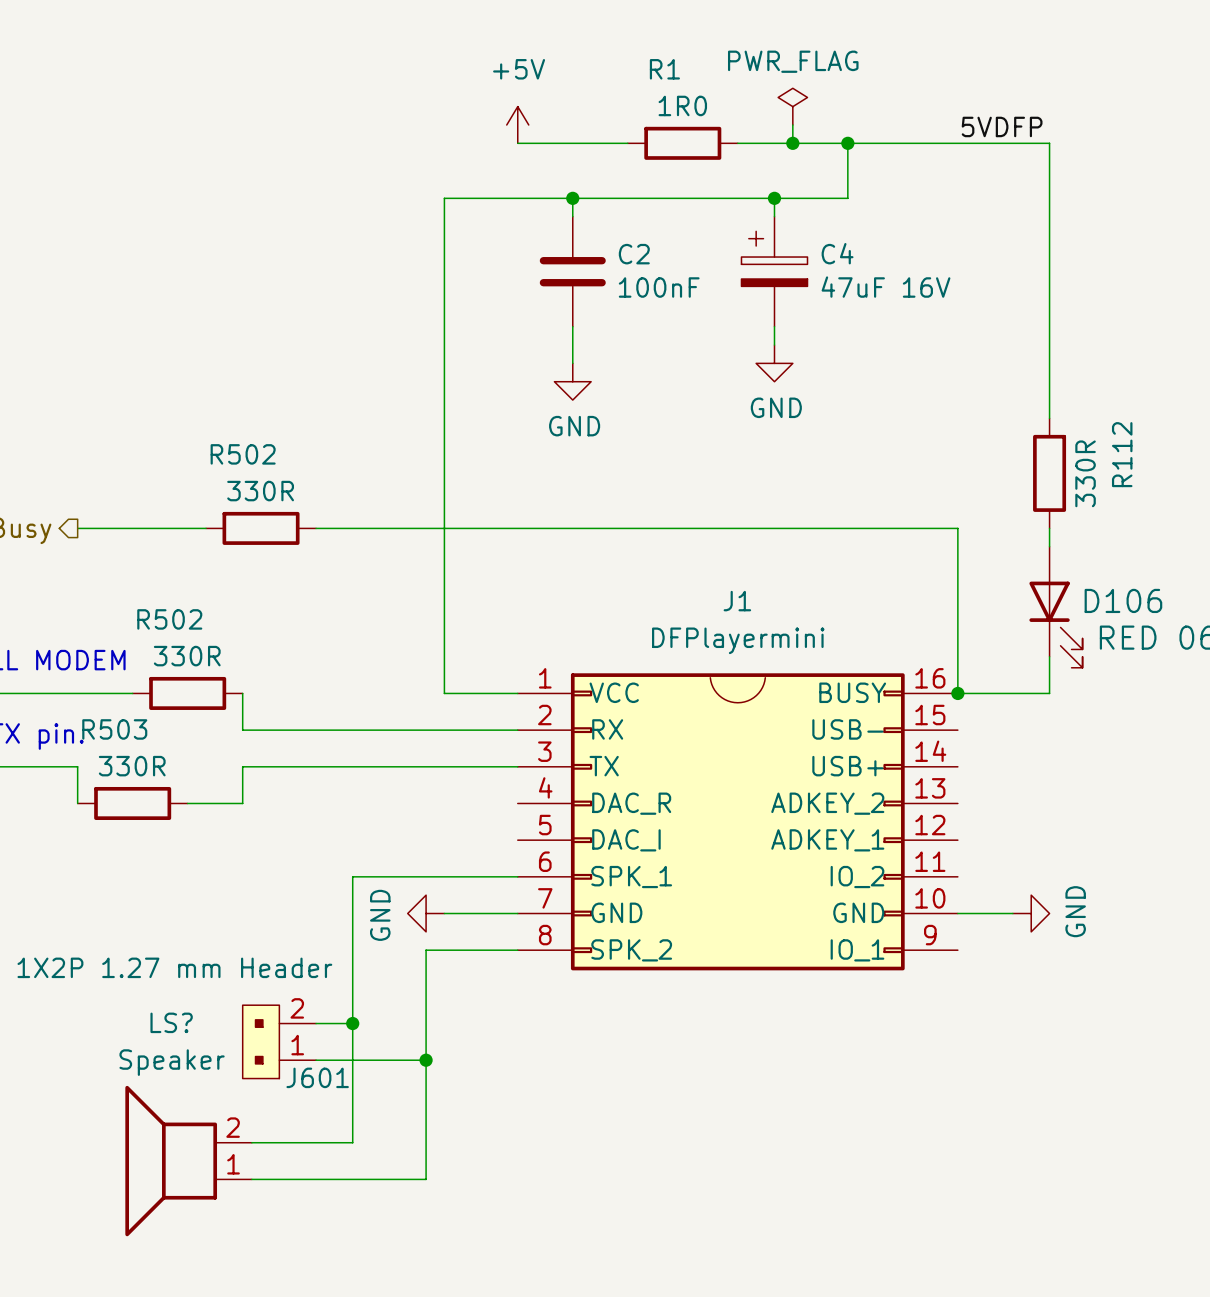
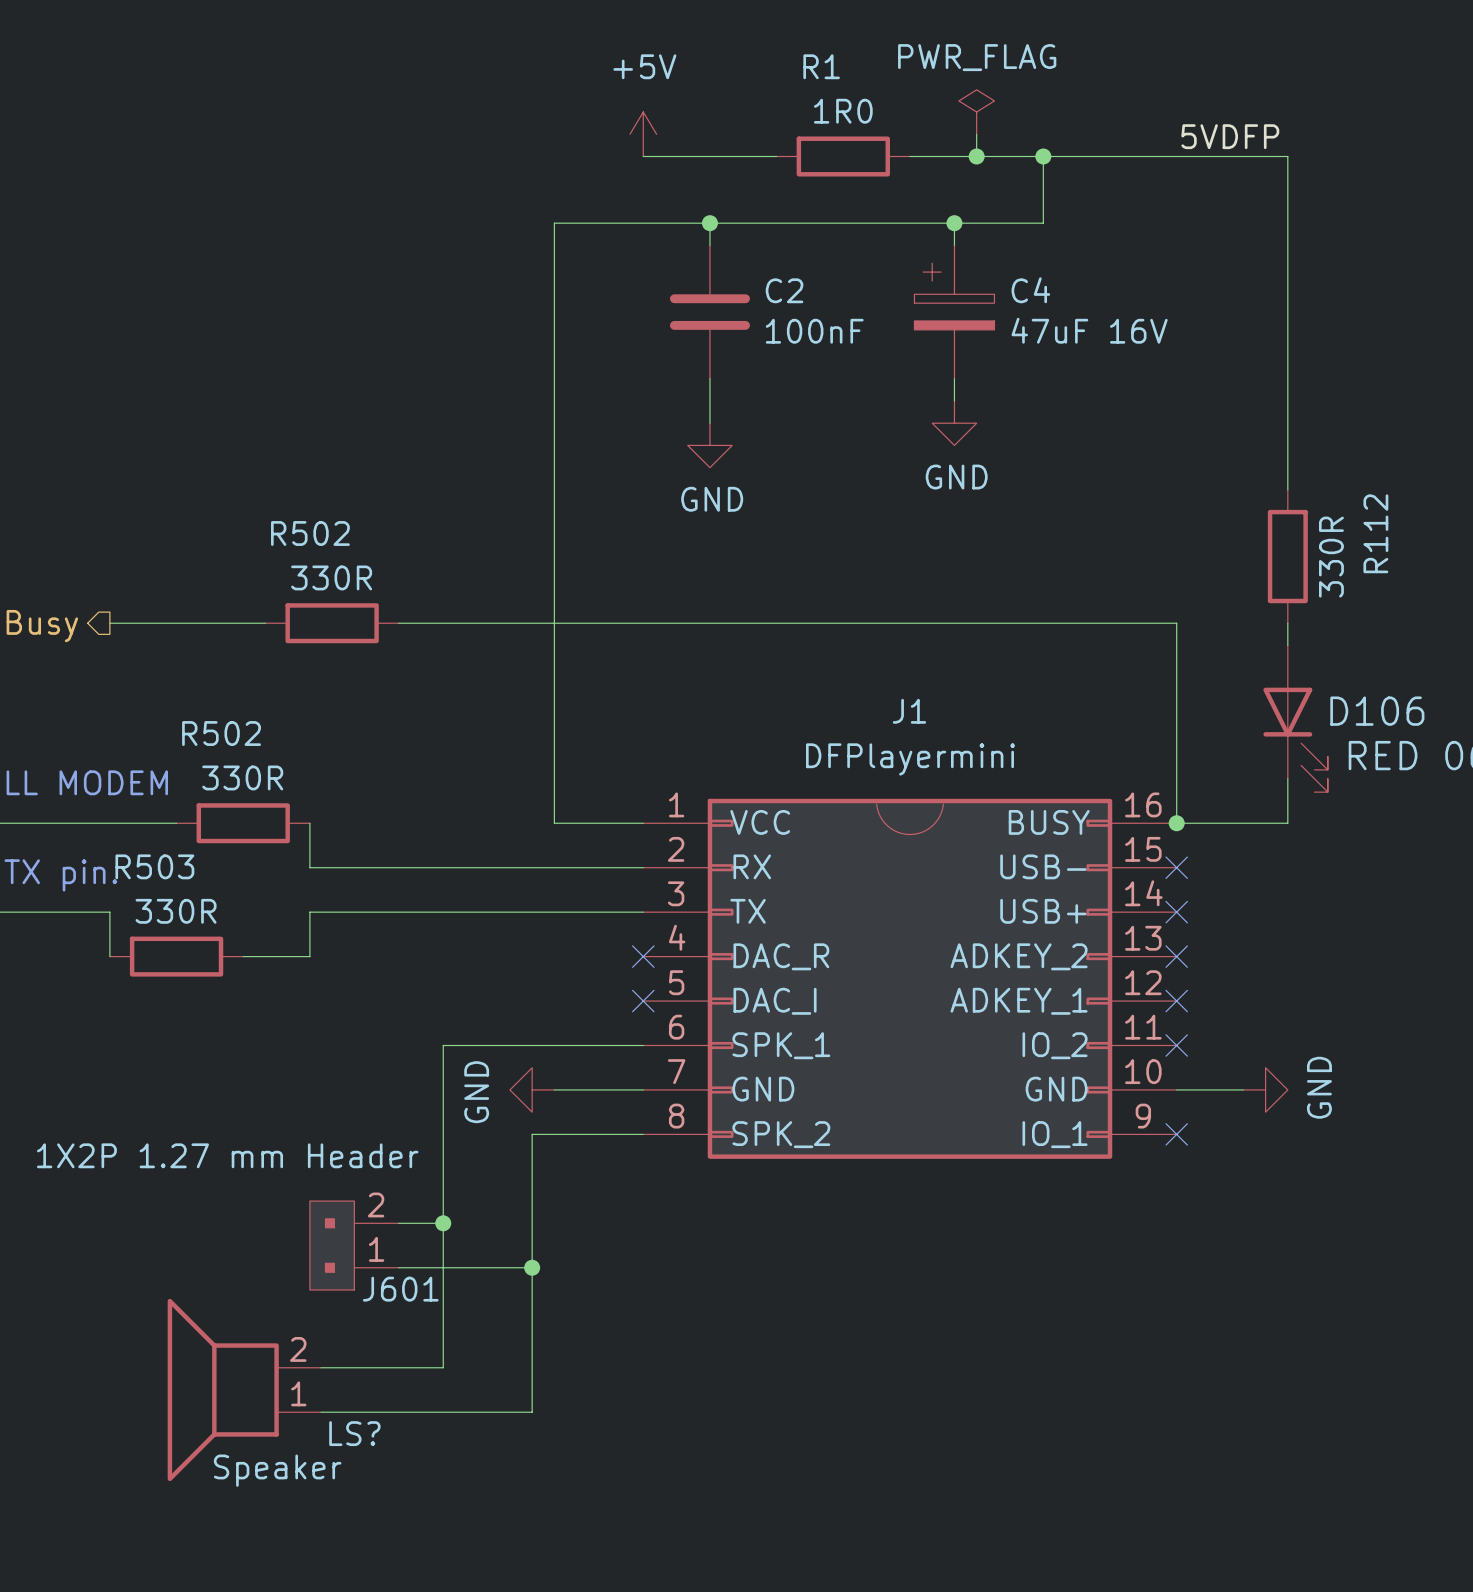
no-connect mark: none -> (1176, 867)
no-connect mark: none -> (1176, 912)
no-connect mark: none -> (643, 956)
no-connect mark: none -> (1176, 956)
no-connect mark: none -> (643, 1001)
no-connect mark: none -> (1176, 1001)
no-connect mark: none -> (1176, 1045)
no-connect mark: none -> (1176, 1134)
LS? name position: LS? (171, 1022) -> LS? (354, 1433)
LS? value position: Speaker (172, 1062) -> Speaker (277, 1470)

